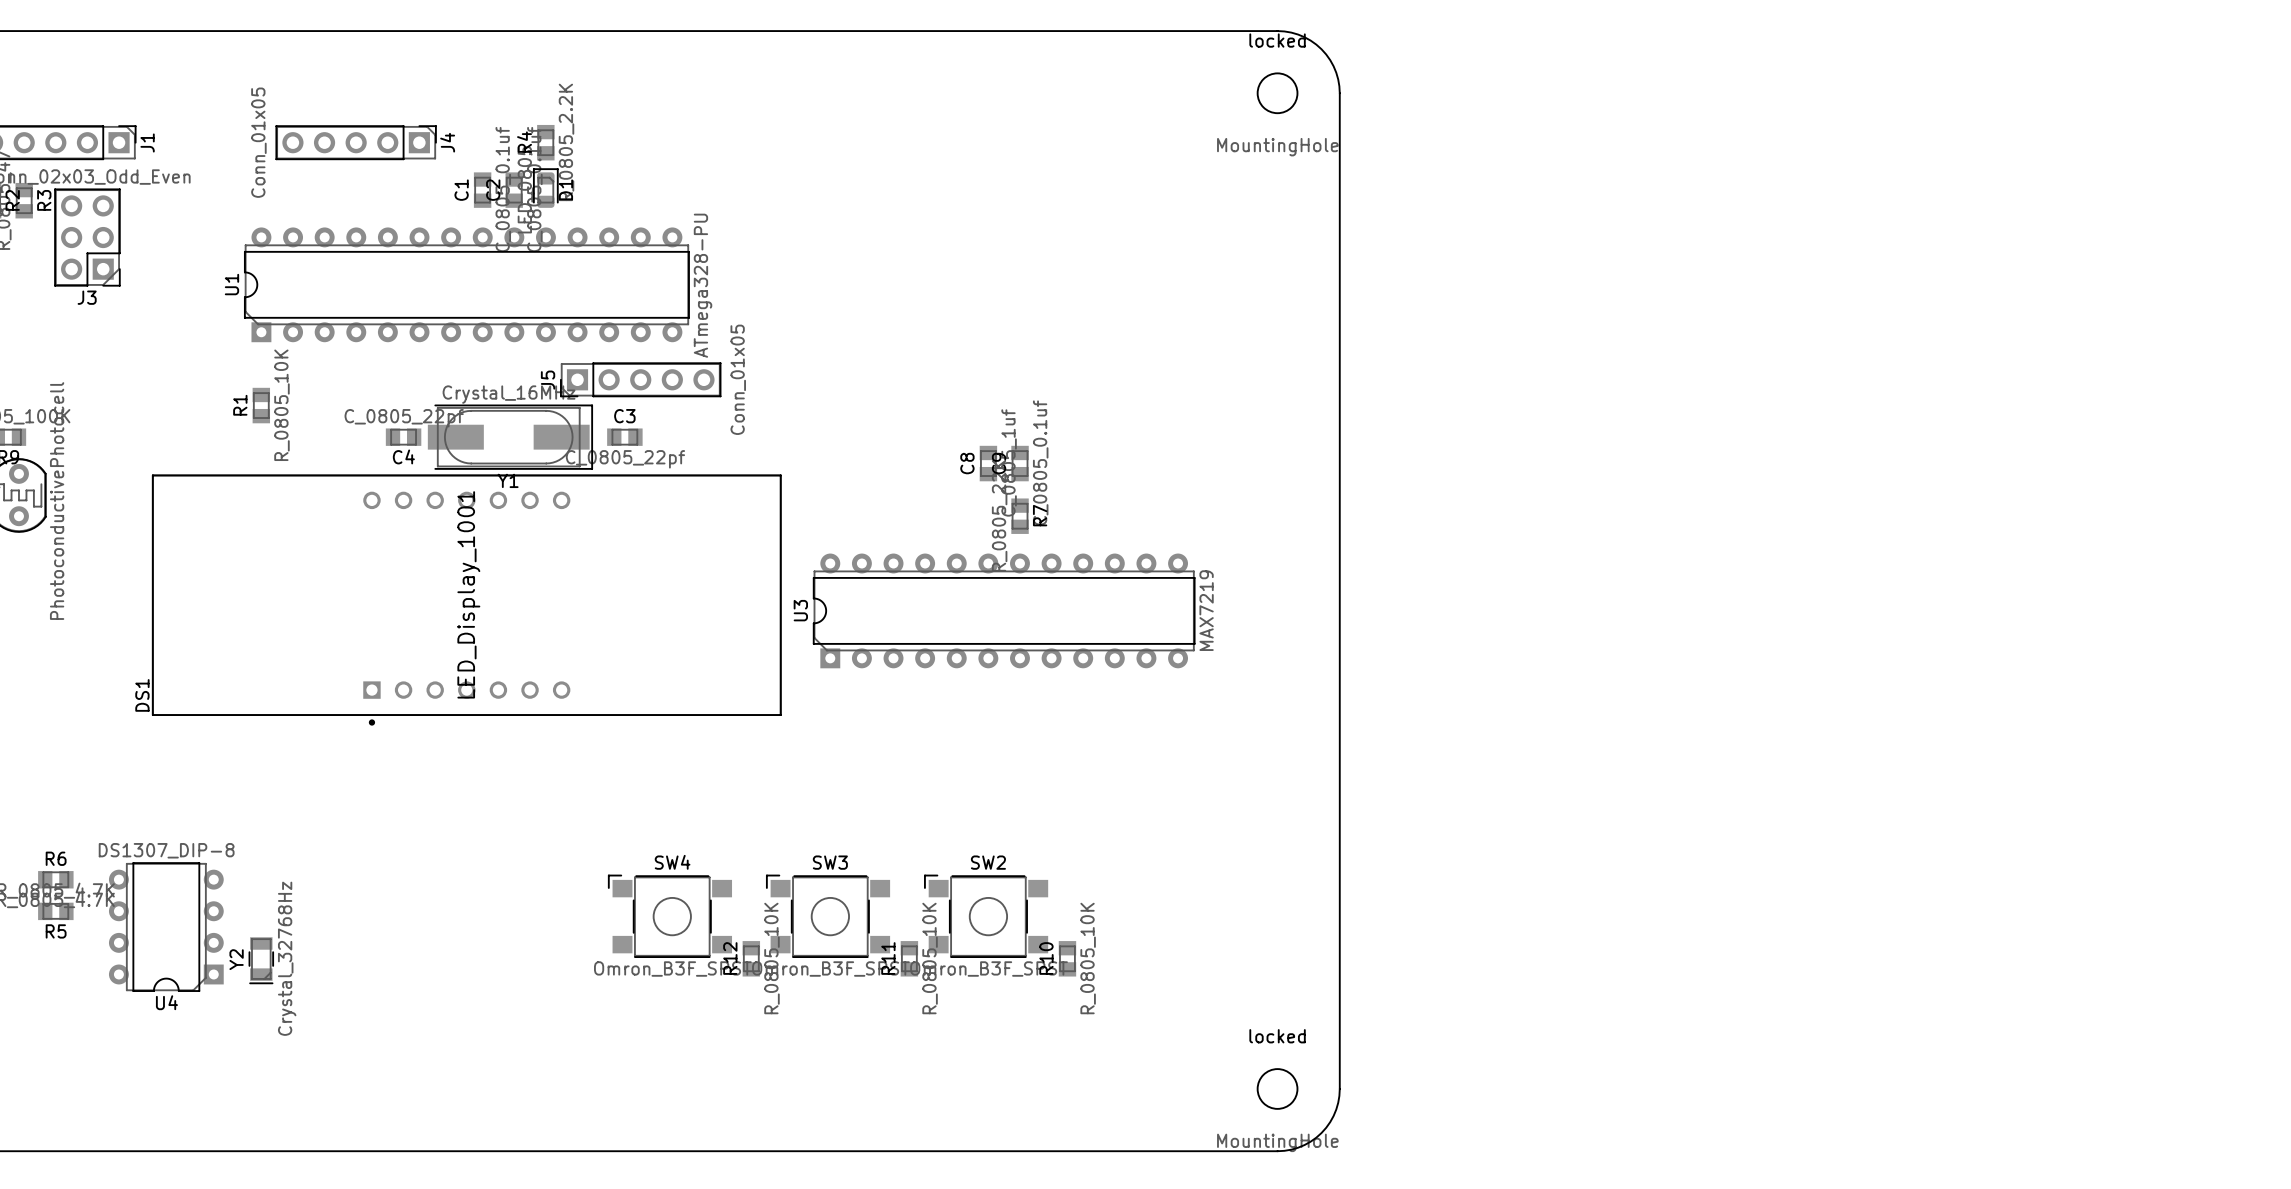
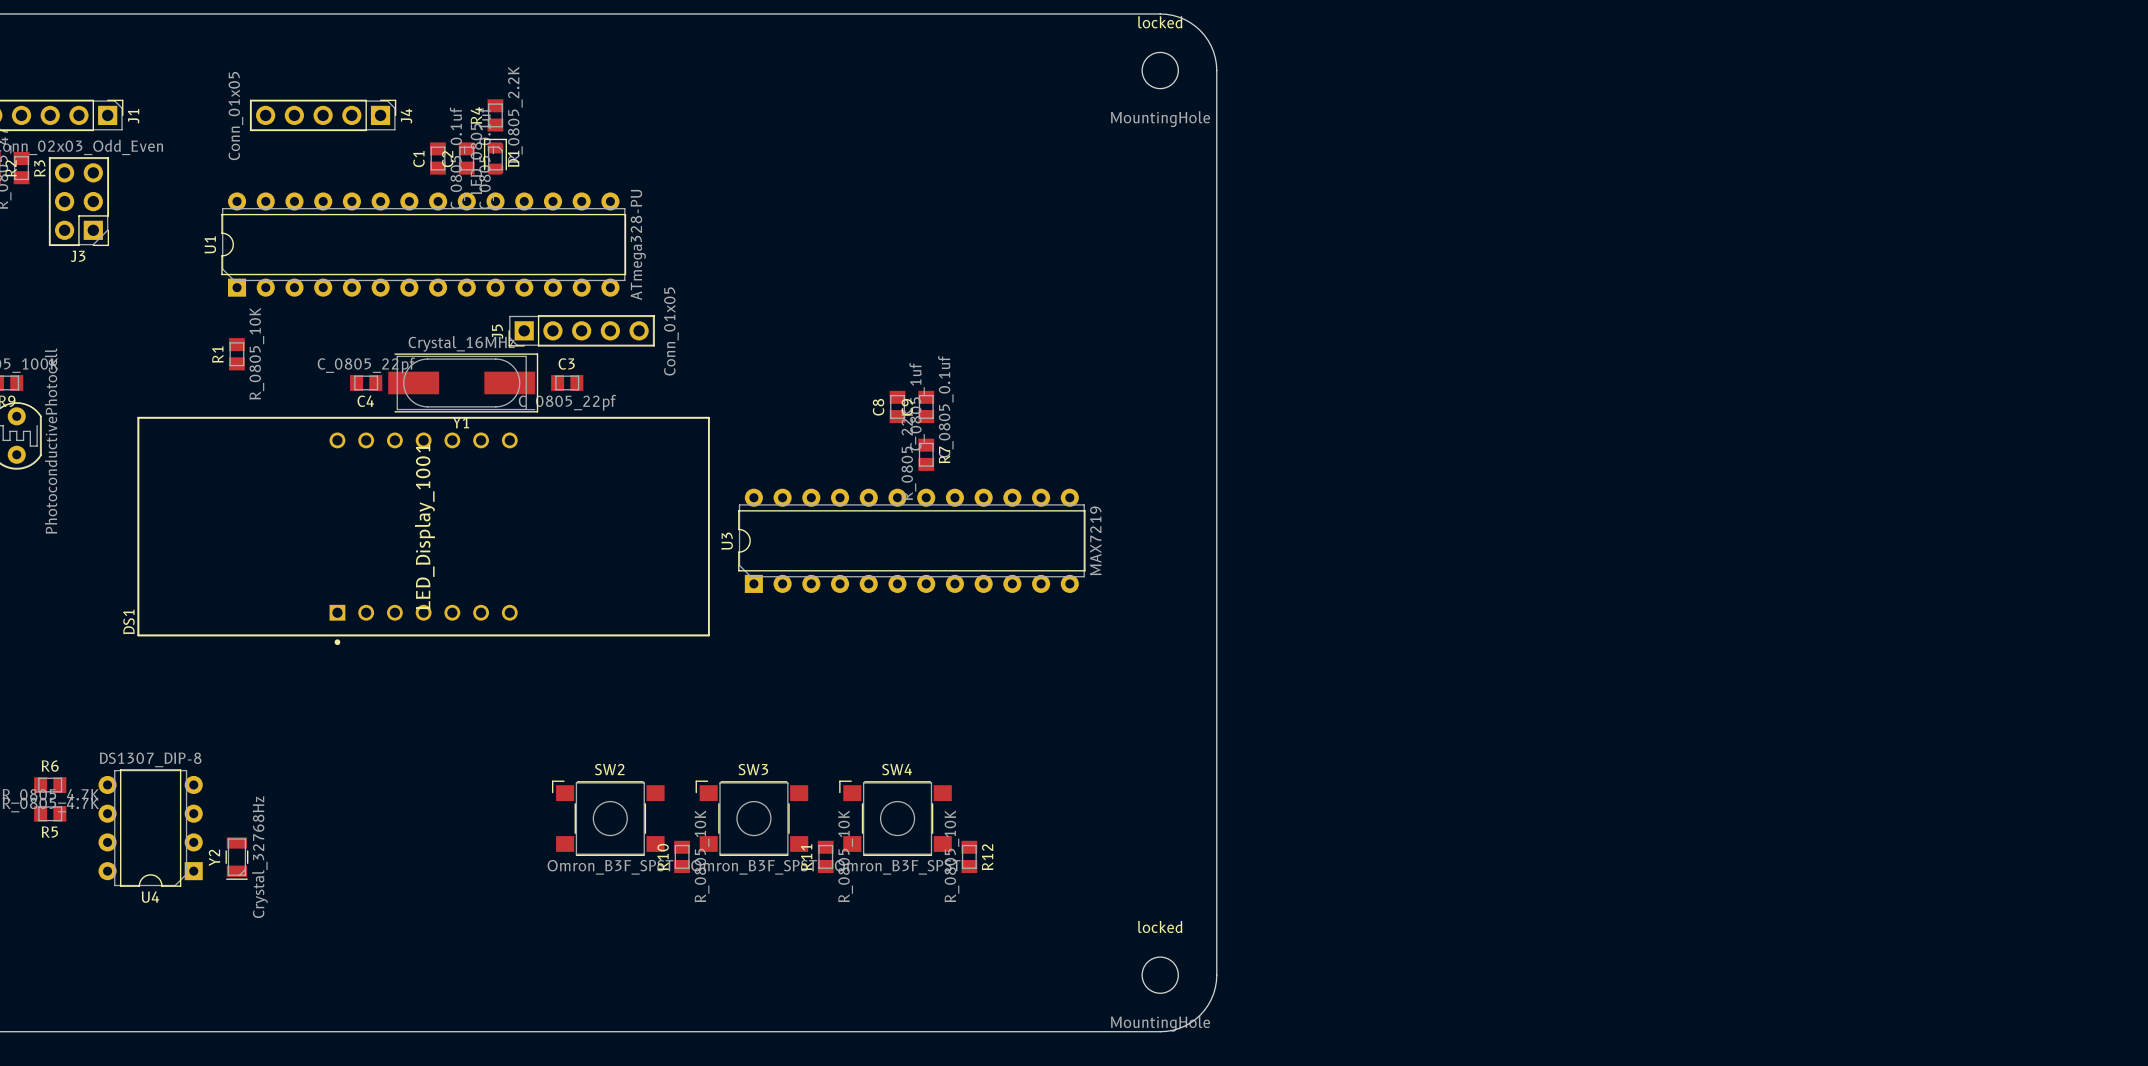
SW4 name: SW4 (672, 862) -> SW2 (609, 769)
SW2 name: SW2 (988, 862) -> SW4 (897, 769)
R12 name: R12 (730, 958) -> R10 (663, 857)
R10 name: R10 (1046, 958) -> R12 (987, 857)
R10 value position: R_0805_10K (1088, 958) -> R_0805_10K (951, 856)

